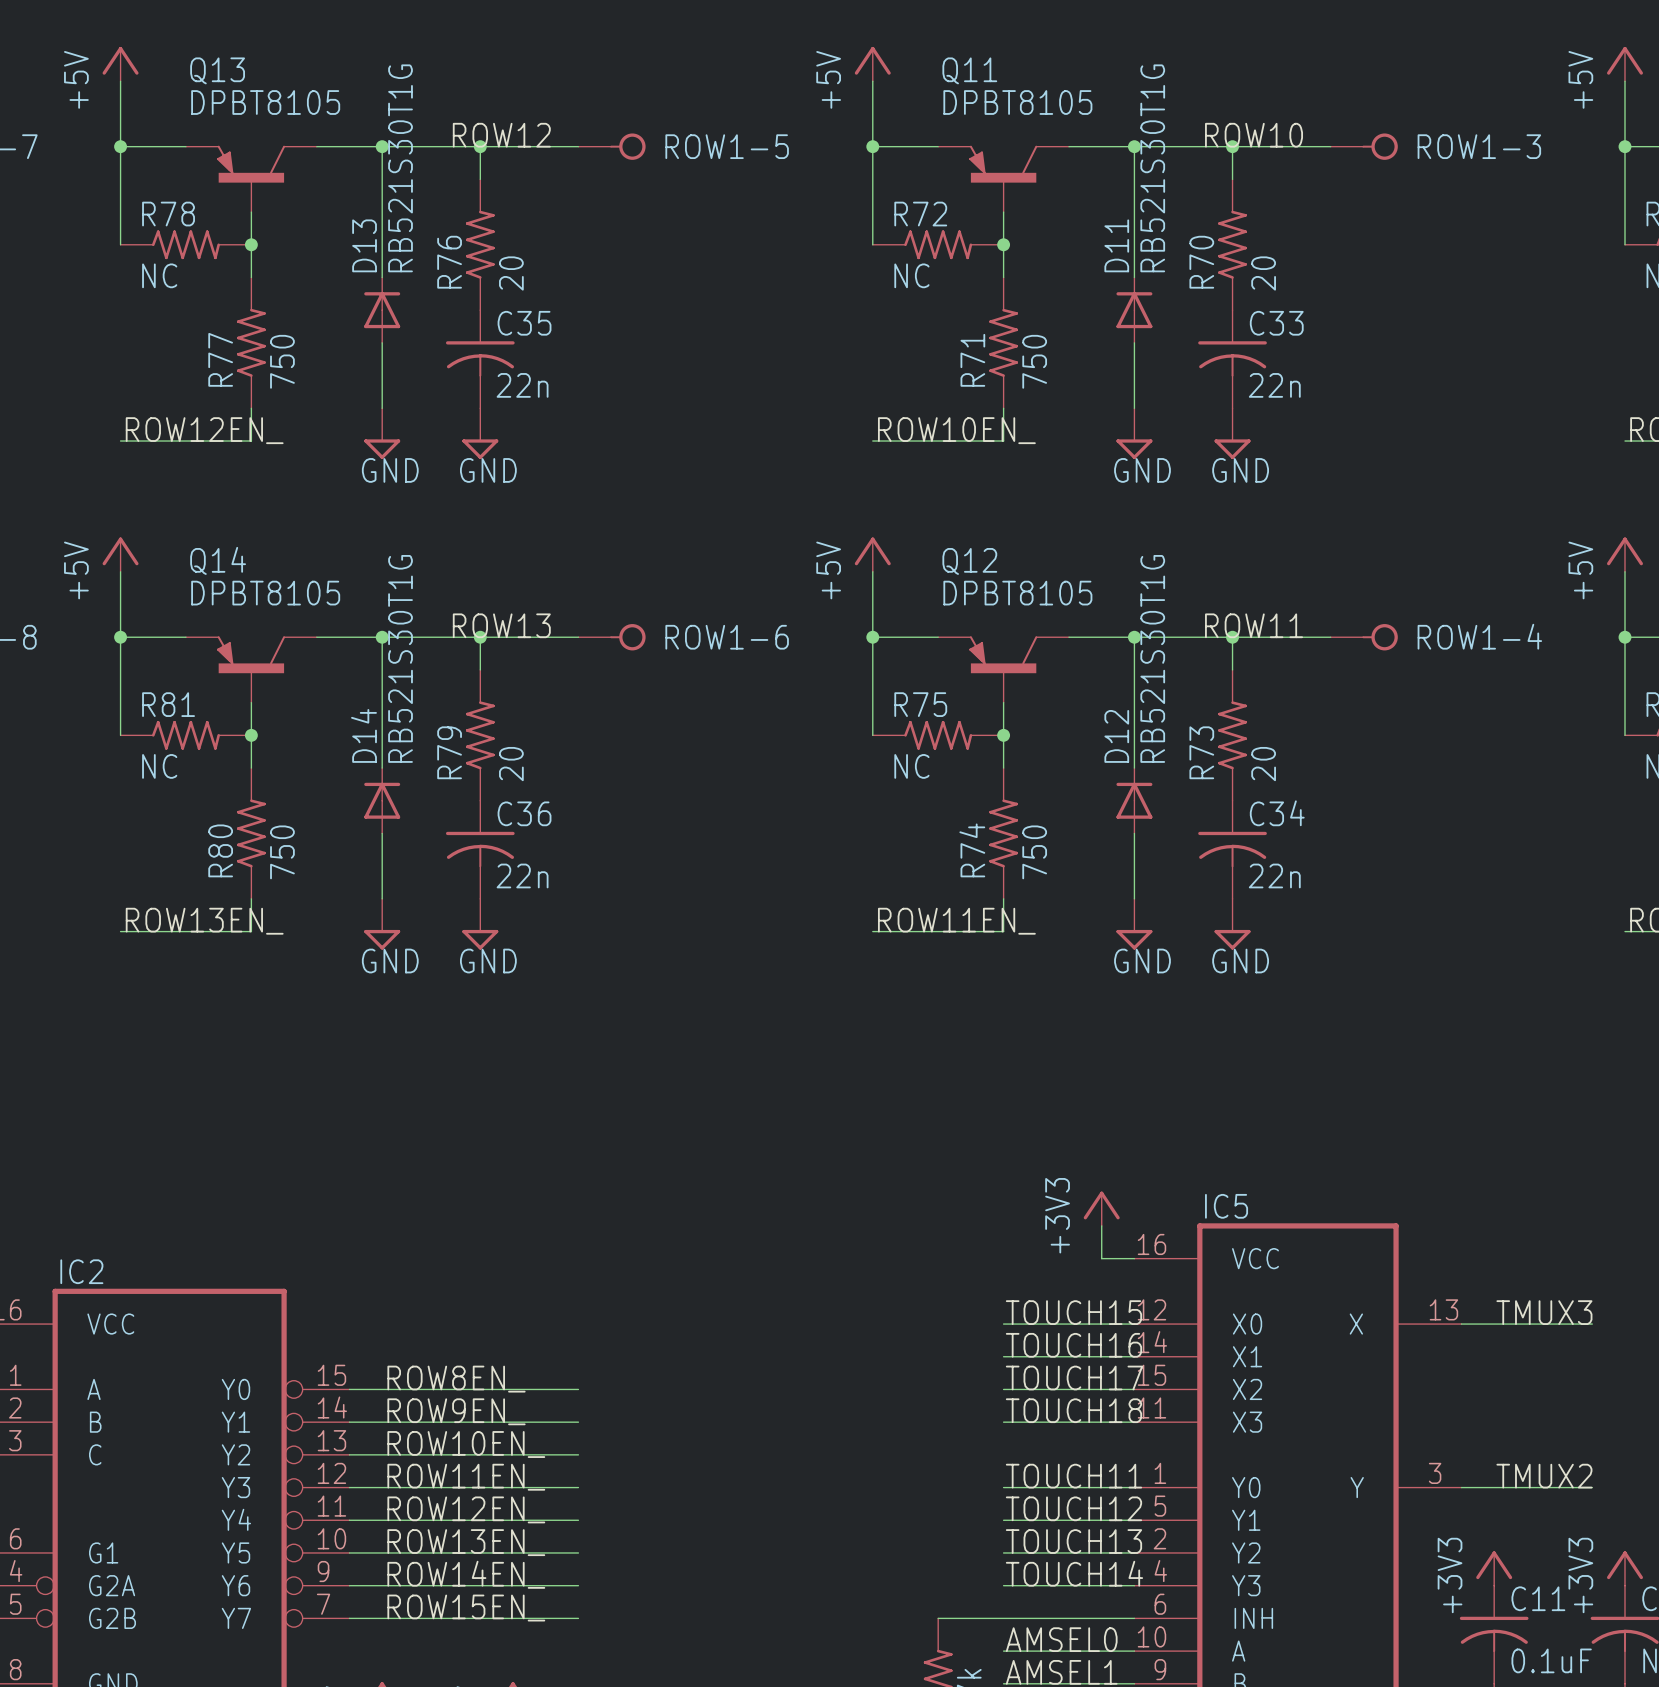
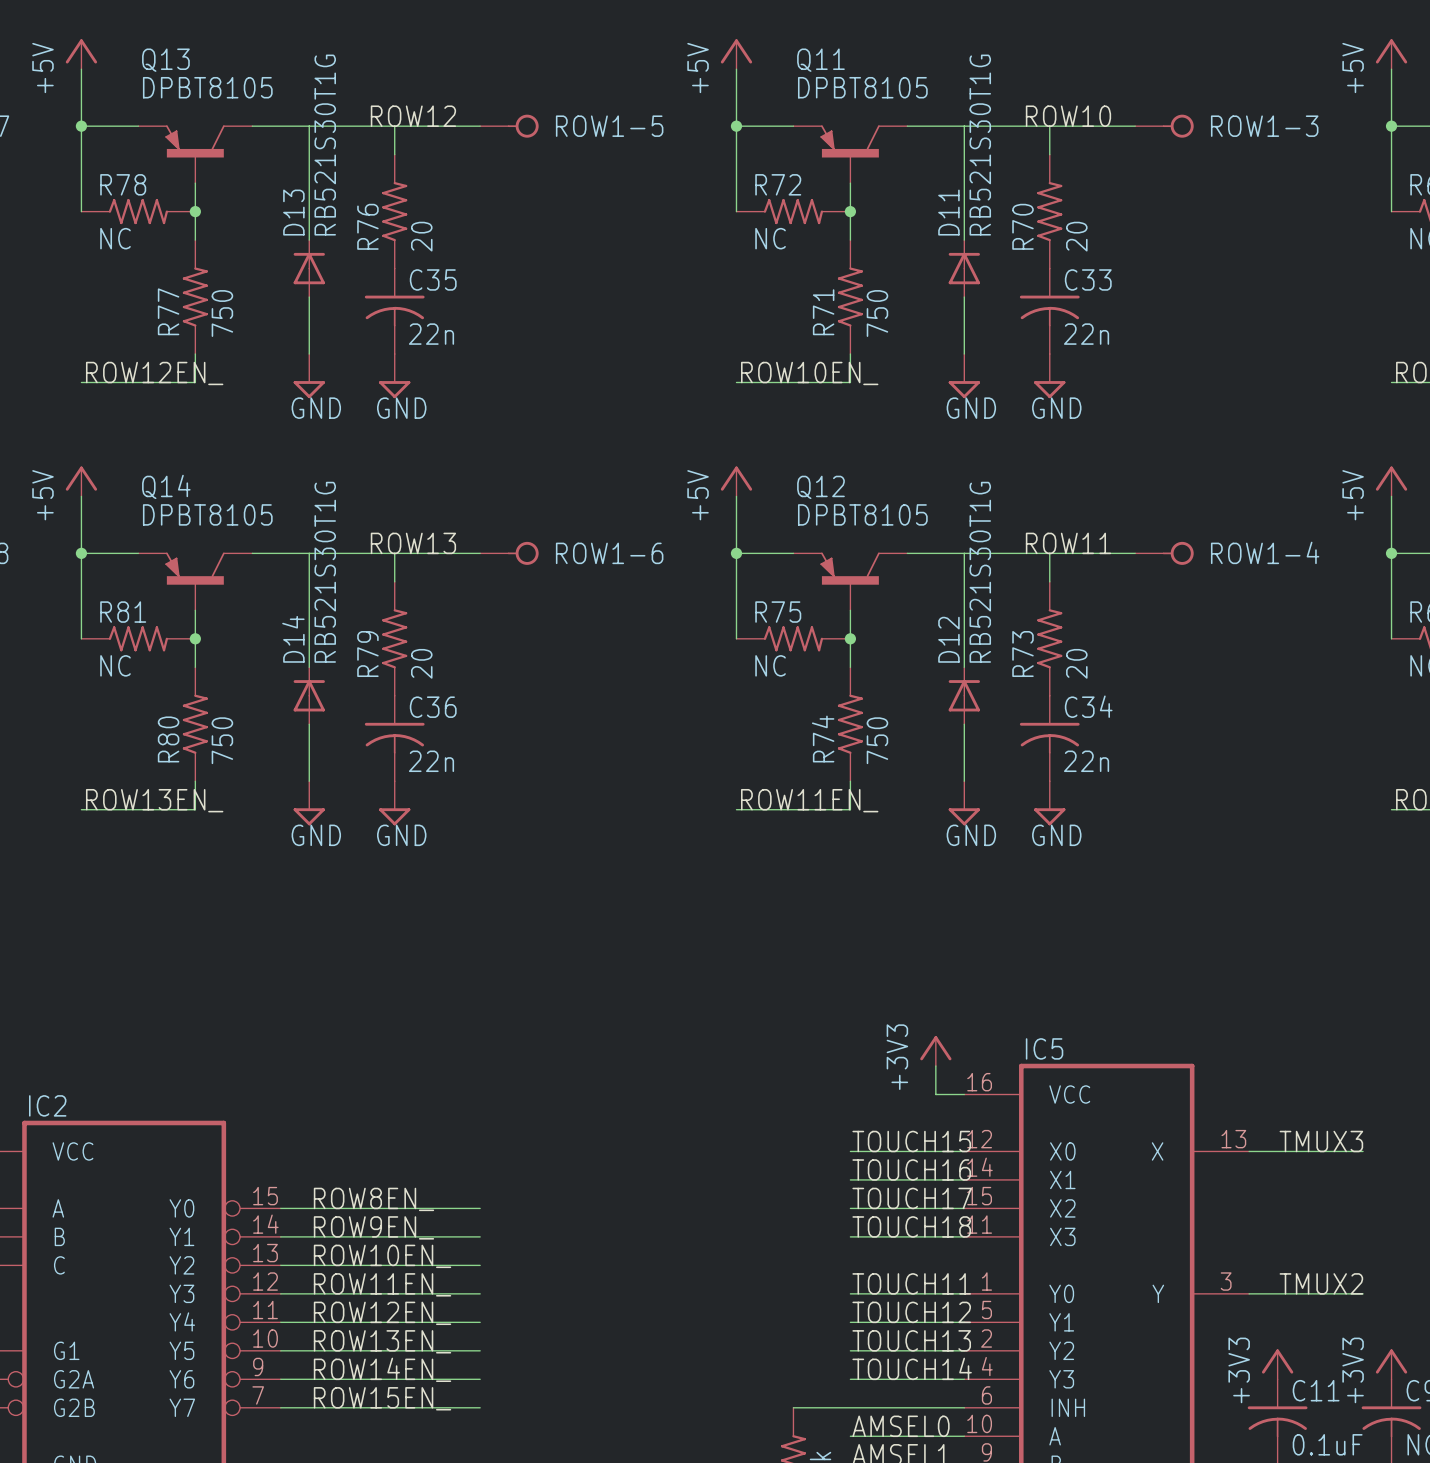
junction: (382, 146) -> none
junction: (480, 146) -> none
junction: (1134, 146) -> none
junction: (1232, 146) -> none
junction: (382, 637) -> none
junction: (480, 637) -> none
junction: (1134, 637) -> none
junction: (1232, 637) -> none

